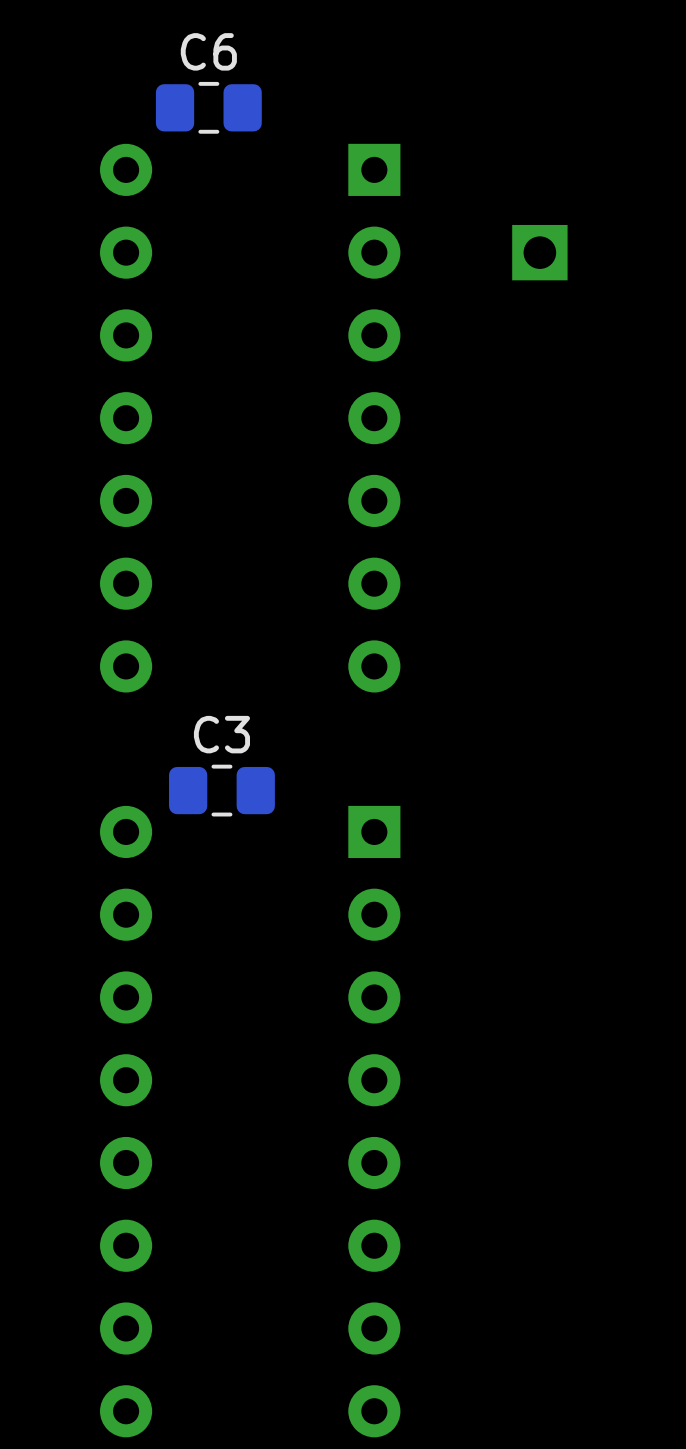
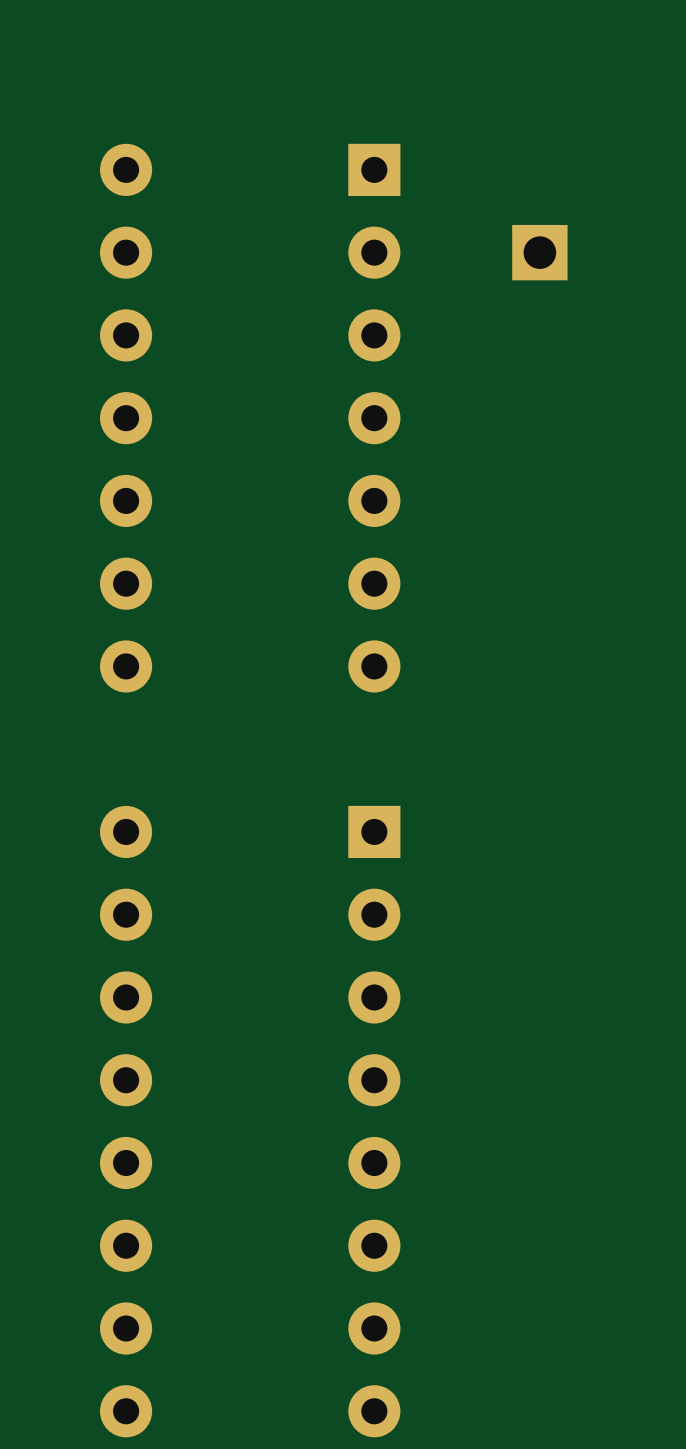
C6: (208, 107) -> none
C3: (221, 790) -> none

